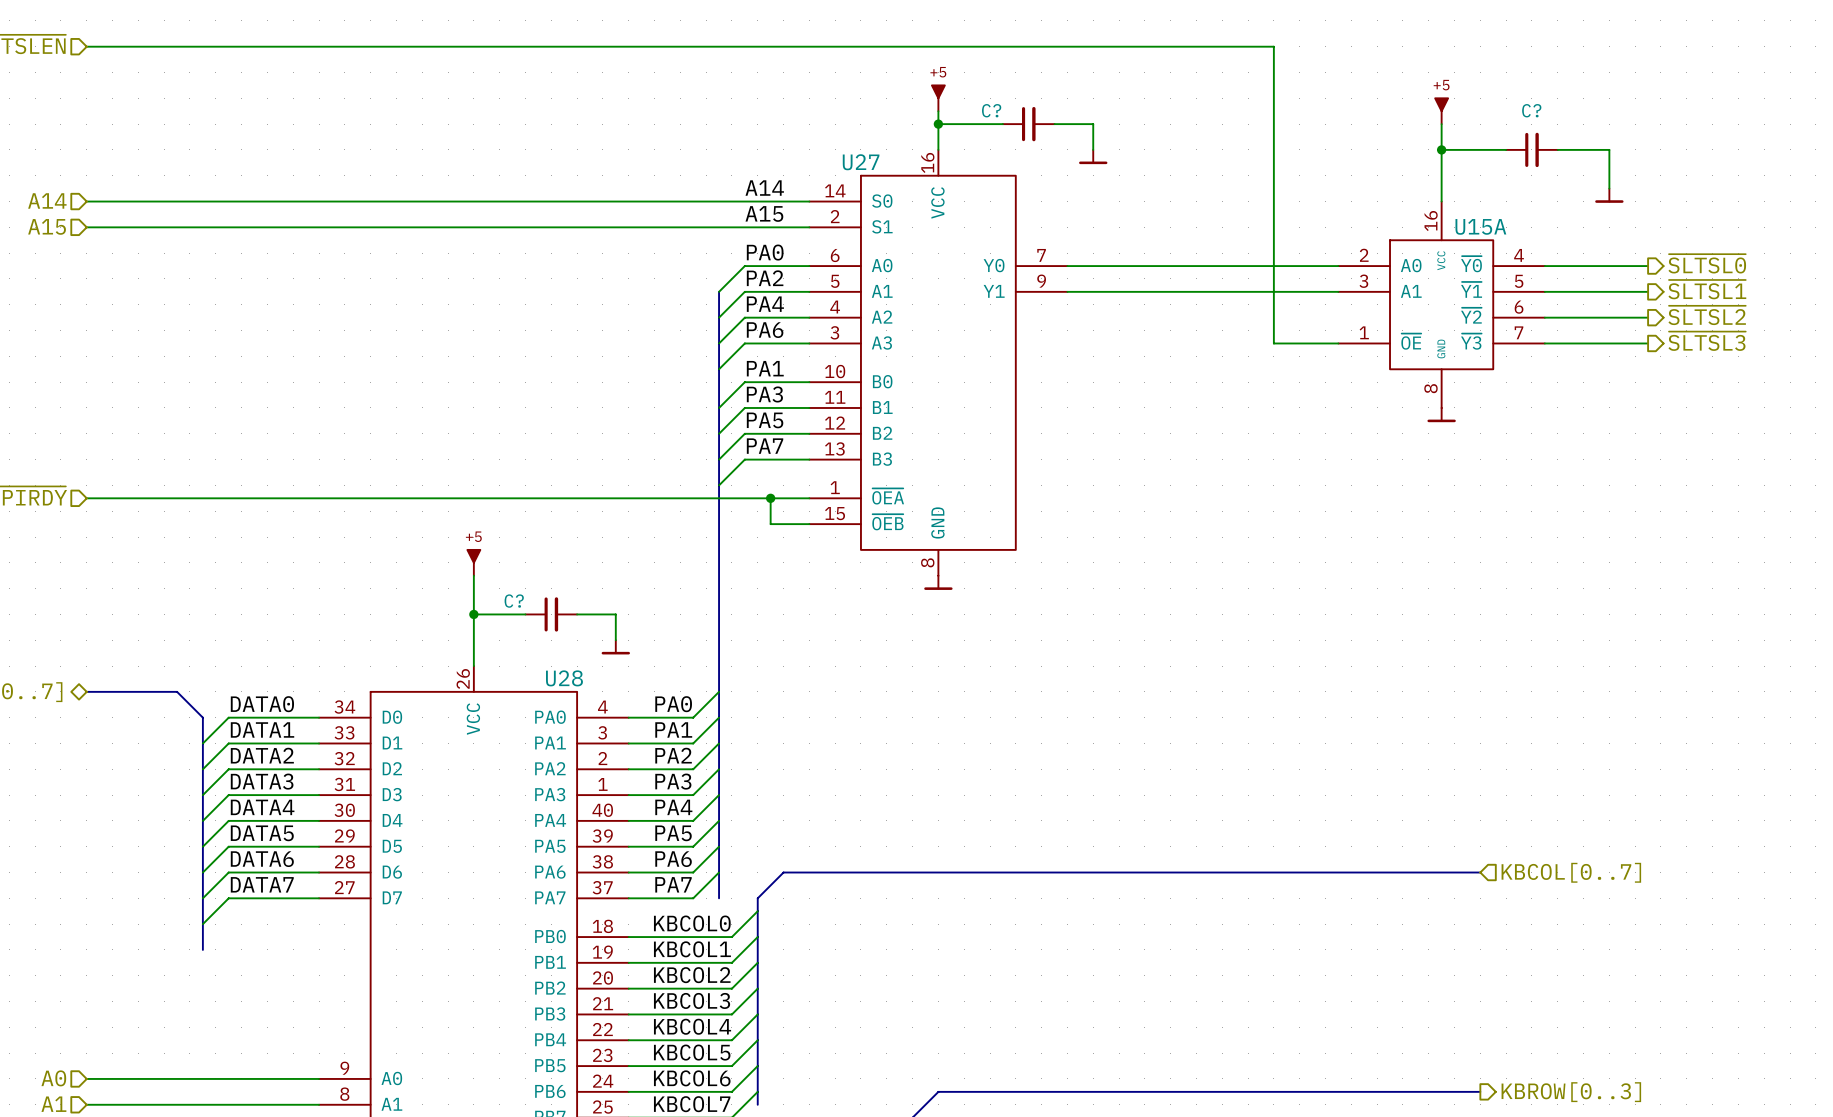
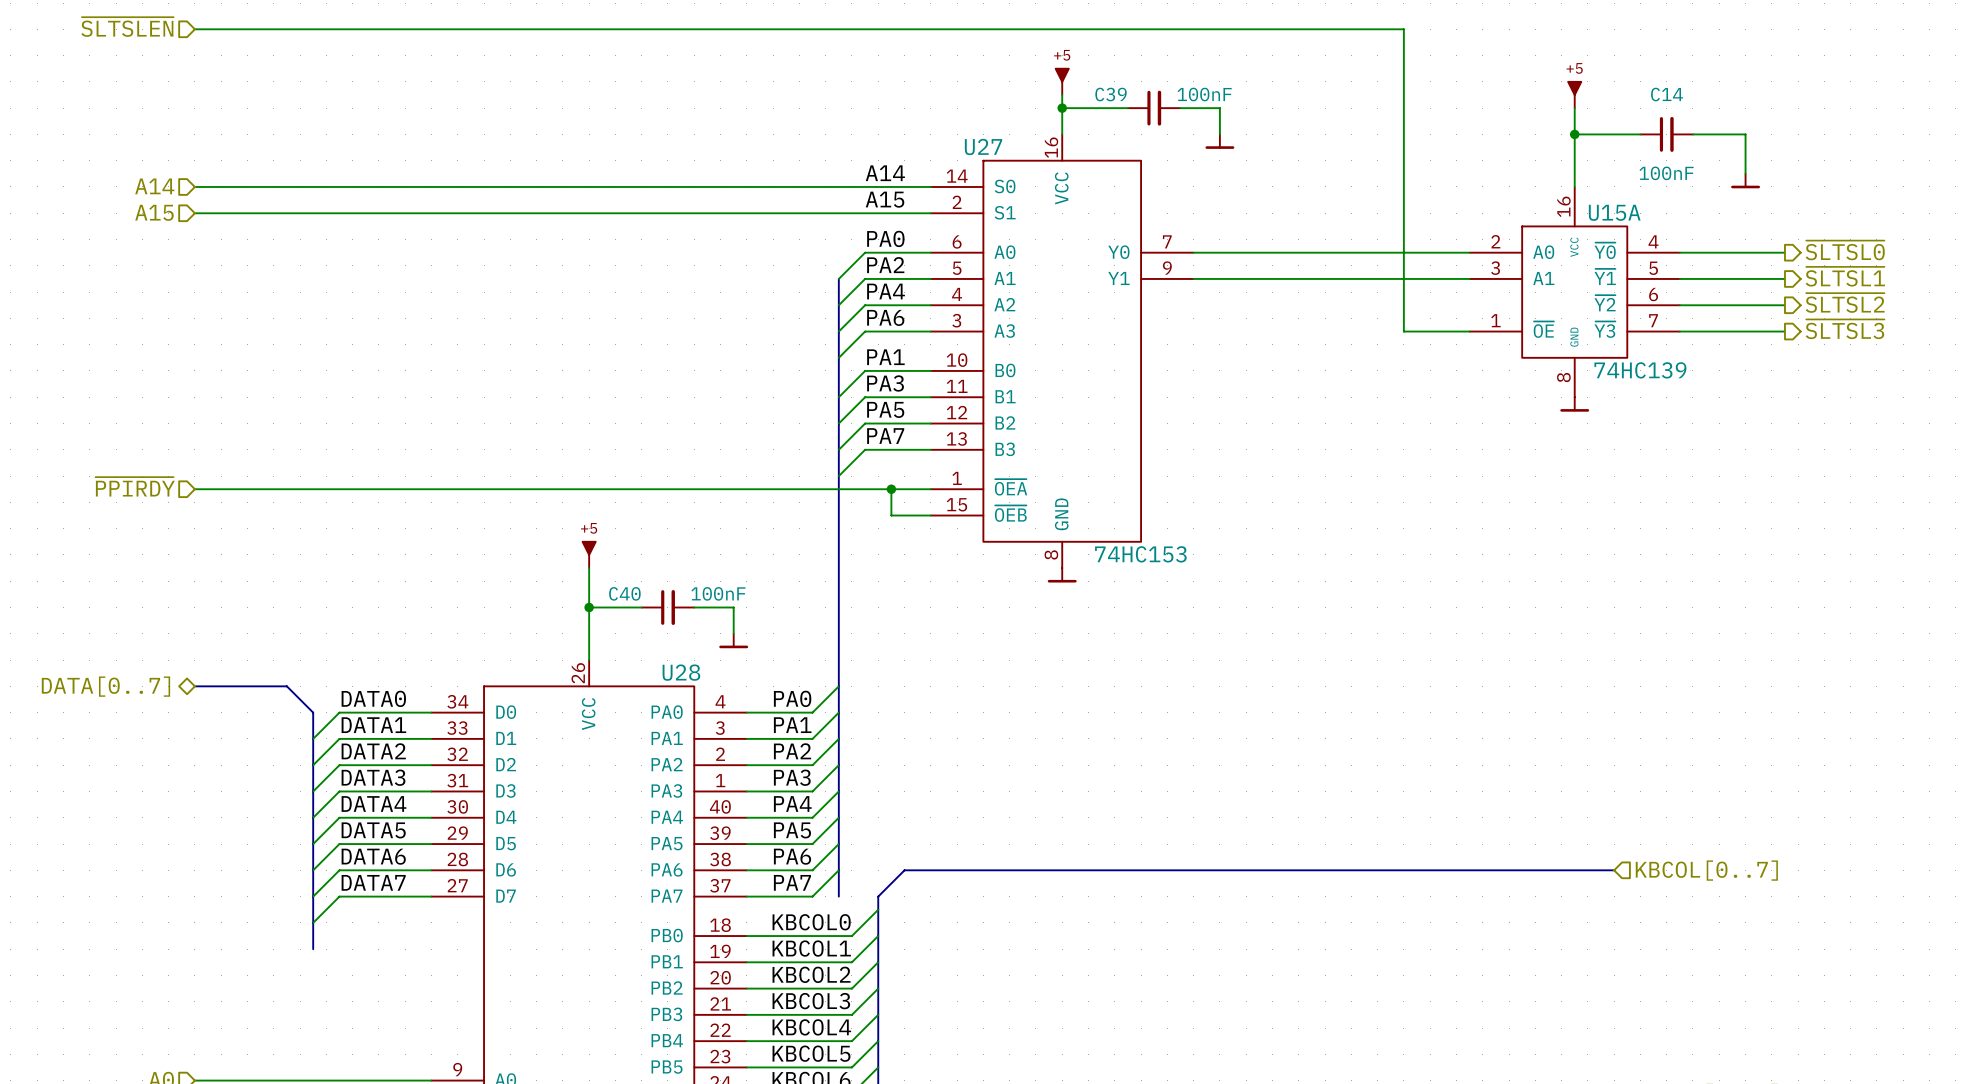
C? name: C? (991, 110) -> C39 (1111, 94)
C? value: none -> 100nF (1204, 94)
C? name: C? (1531, 110) -> C14 (1667, 94)
C? value: none -> 100nF (1666, 173)
U15A value: none -> 74HC139 (1640, 370)
U27 value: none -> 74HC153 (1140, 554)
C? name: C? (514, 601) -> C40 (624, 593)
C? value: none -> 100nF (718, 593)

